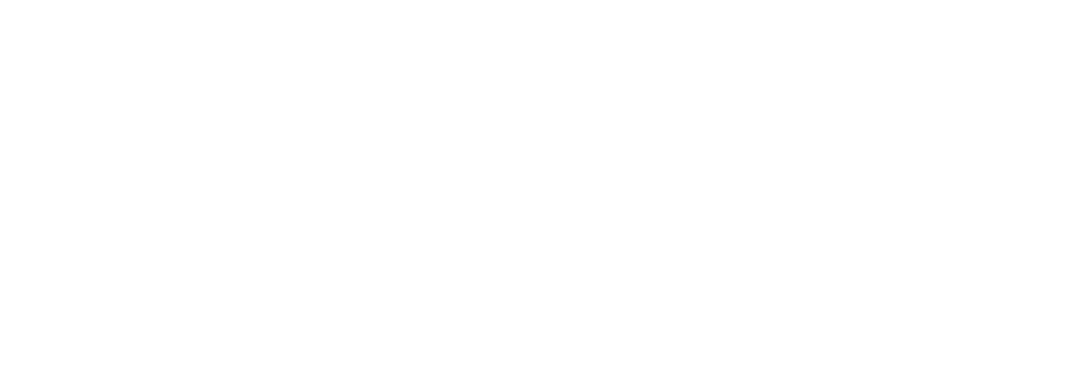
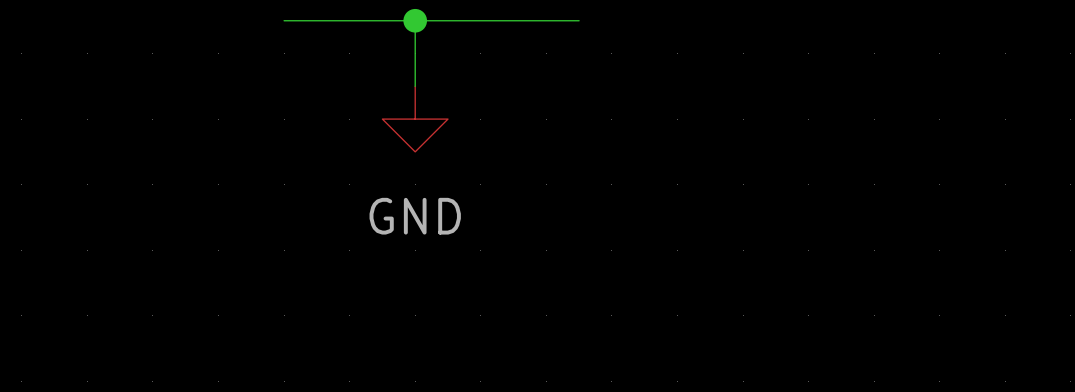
wire: none -> (284, 20) (579, 20)
wire: none -> (415, 20) (415, 86)
junction: none -> (415, 20)
power symbol: none -> GND (415, 119)

